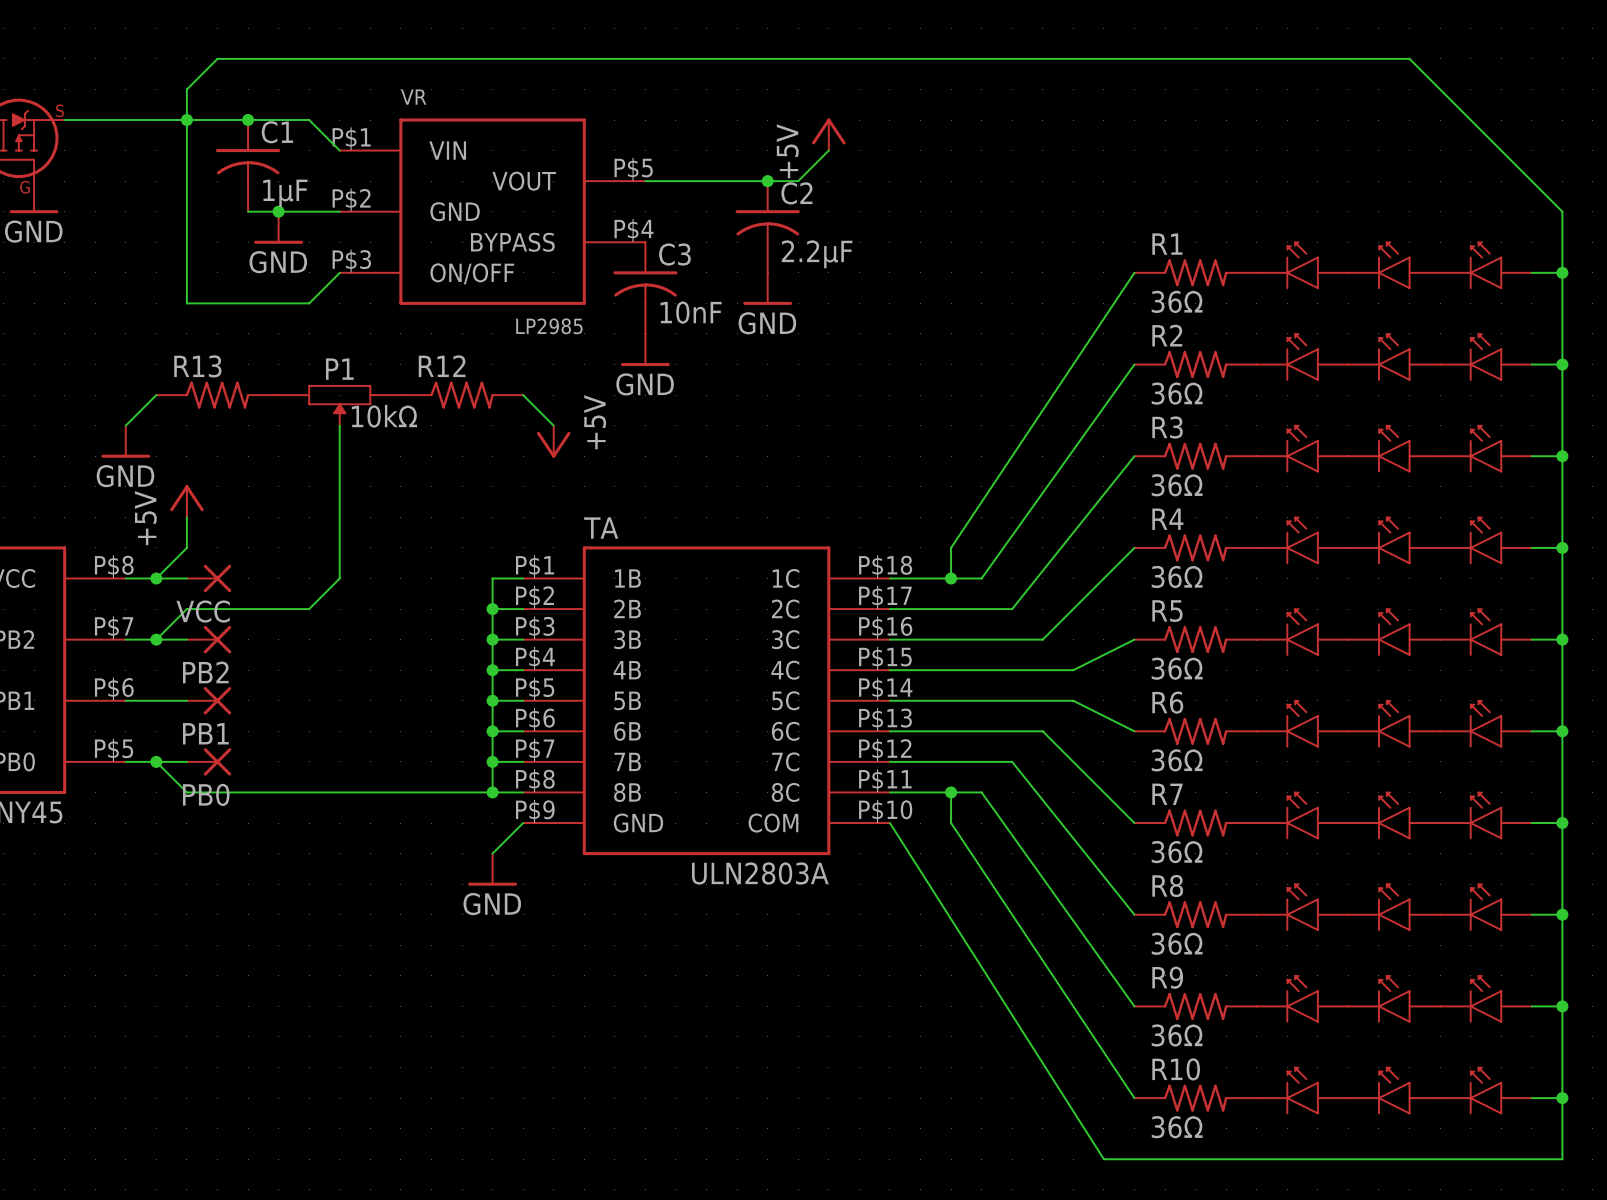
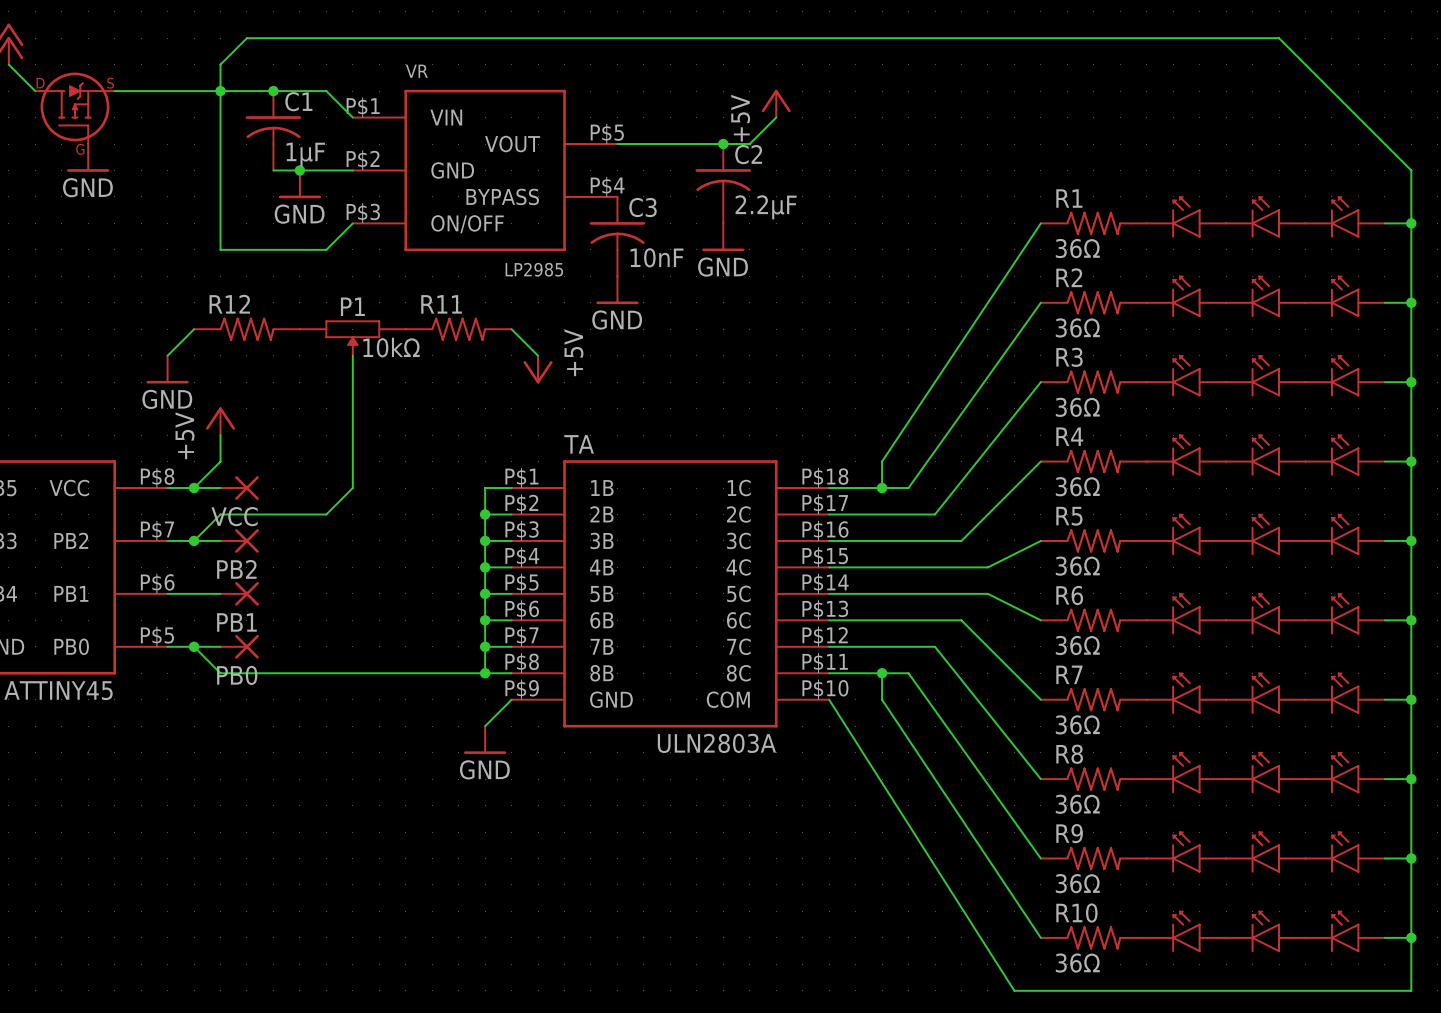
R13 name: R13 (197, 366) -> R12 (229, 304)
R12 name: R12 (442, 366) -> R11 (441, 304)

